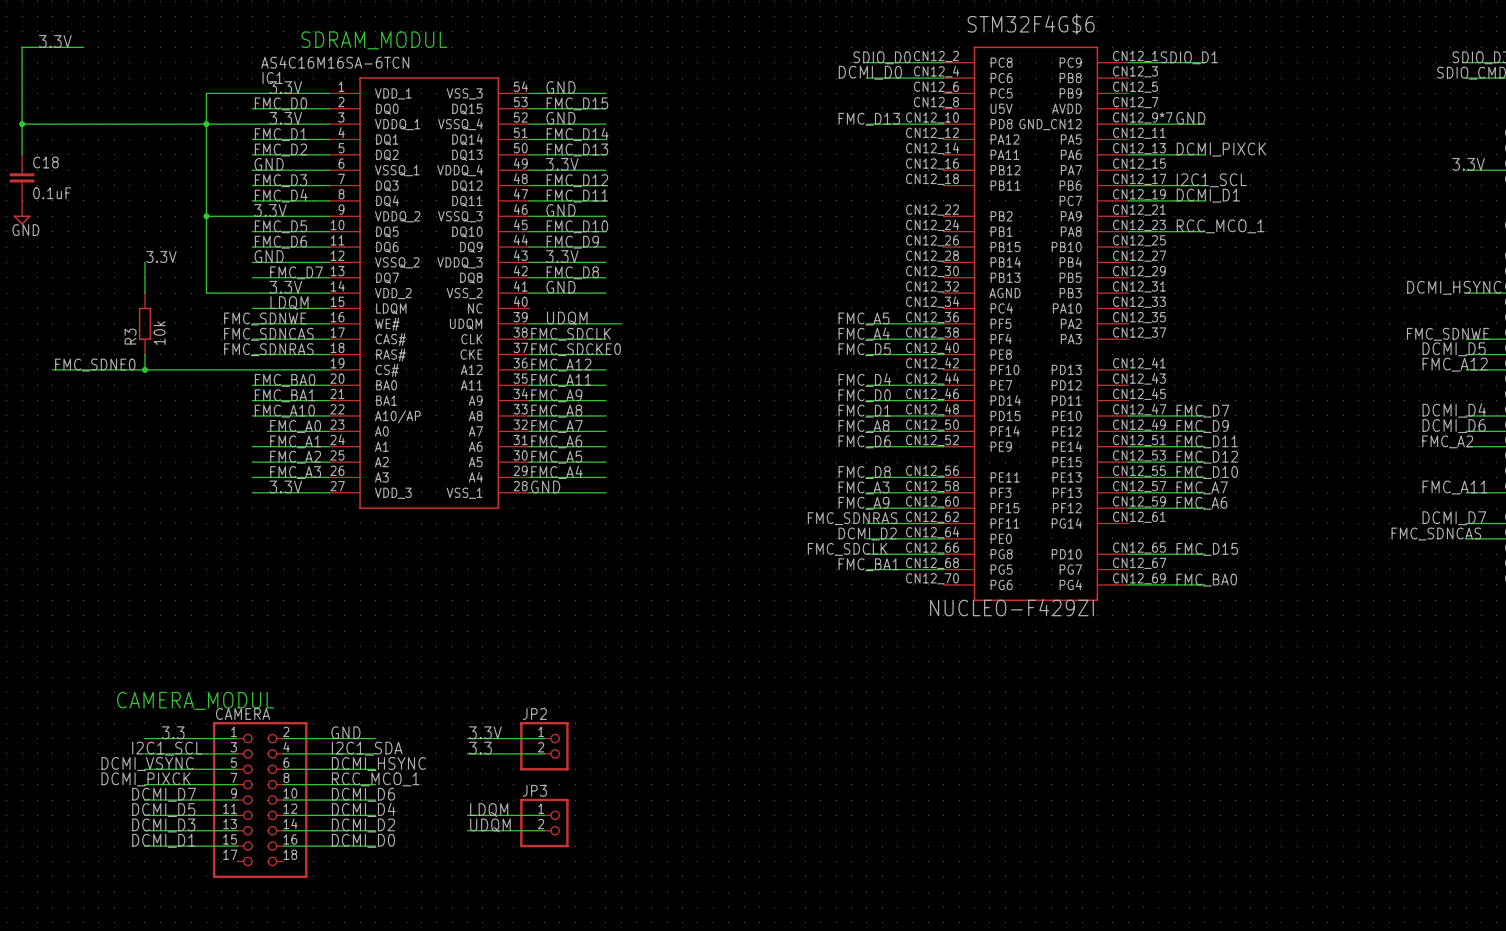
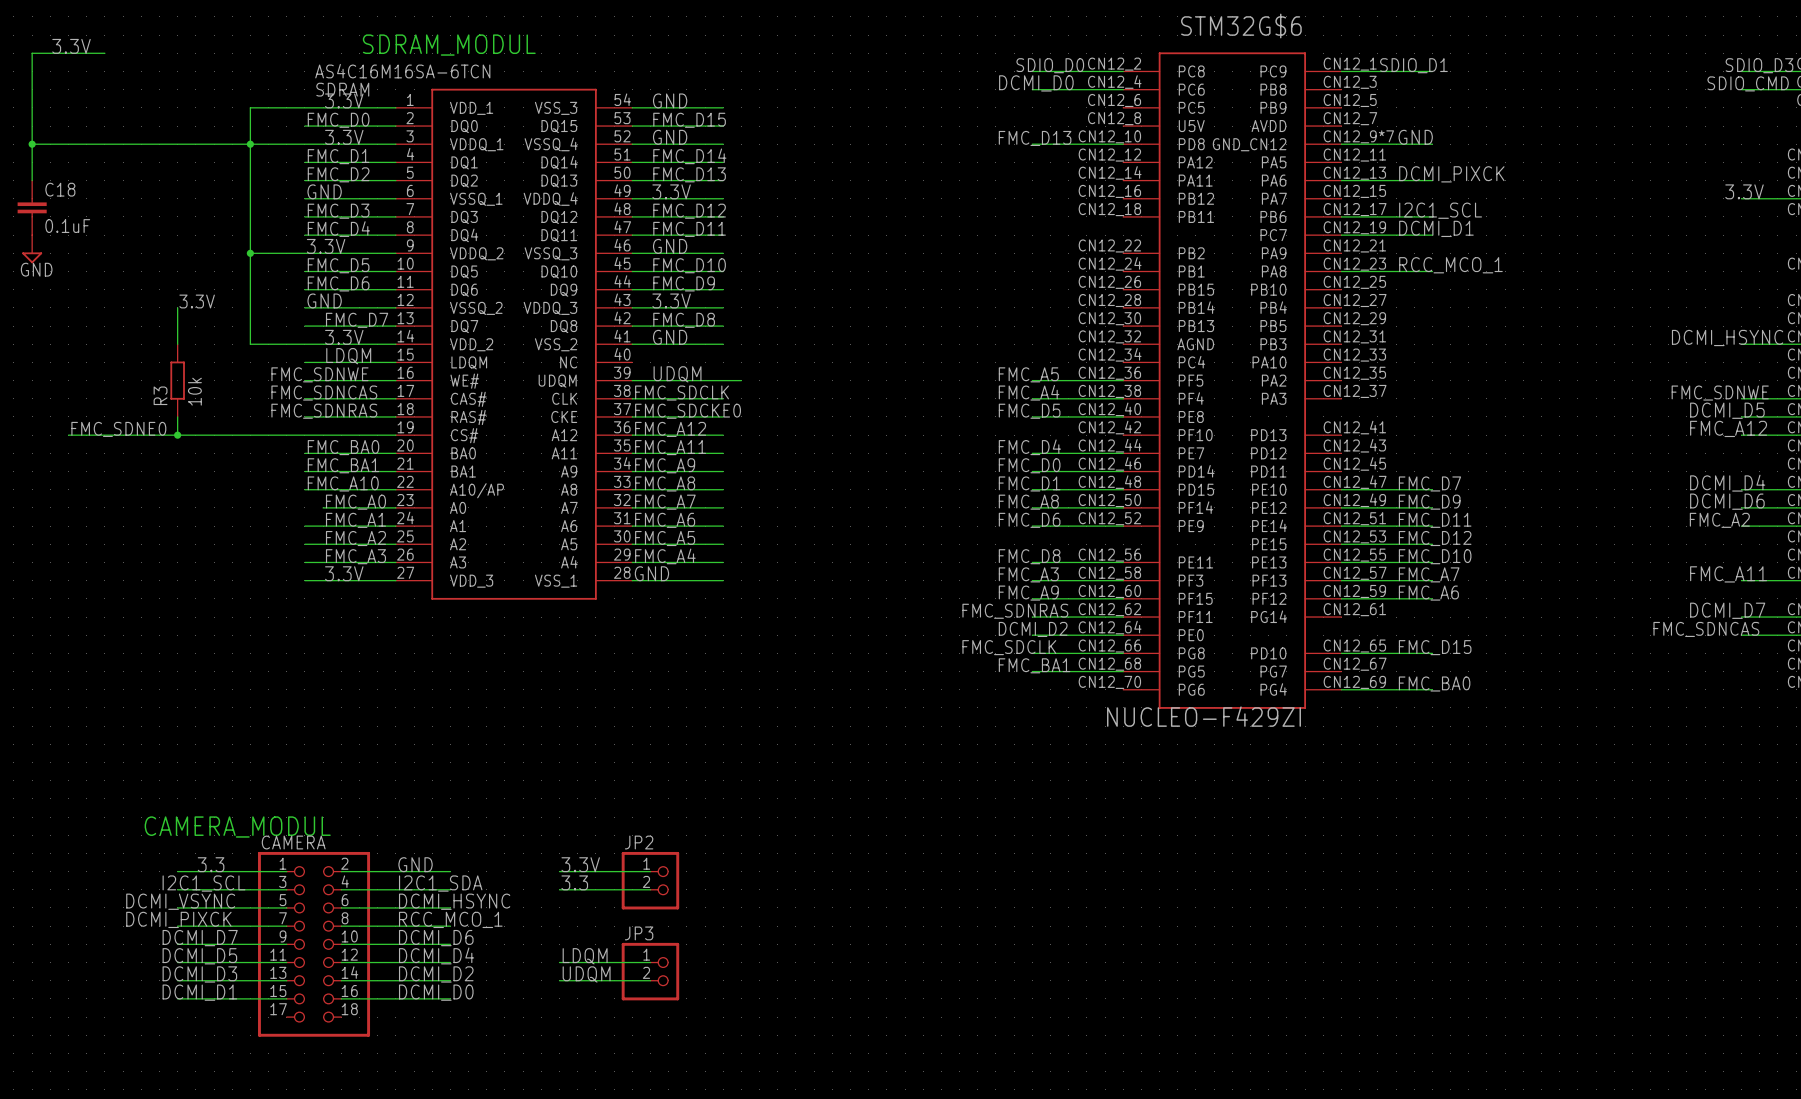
STM32F4G$6 name: STM32F4G$6 (1031, 24) -> STM32G$6 (1241, 26)
IC1 name: IC1 (272, 78) -> SDRAM (342, 89)

